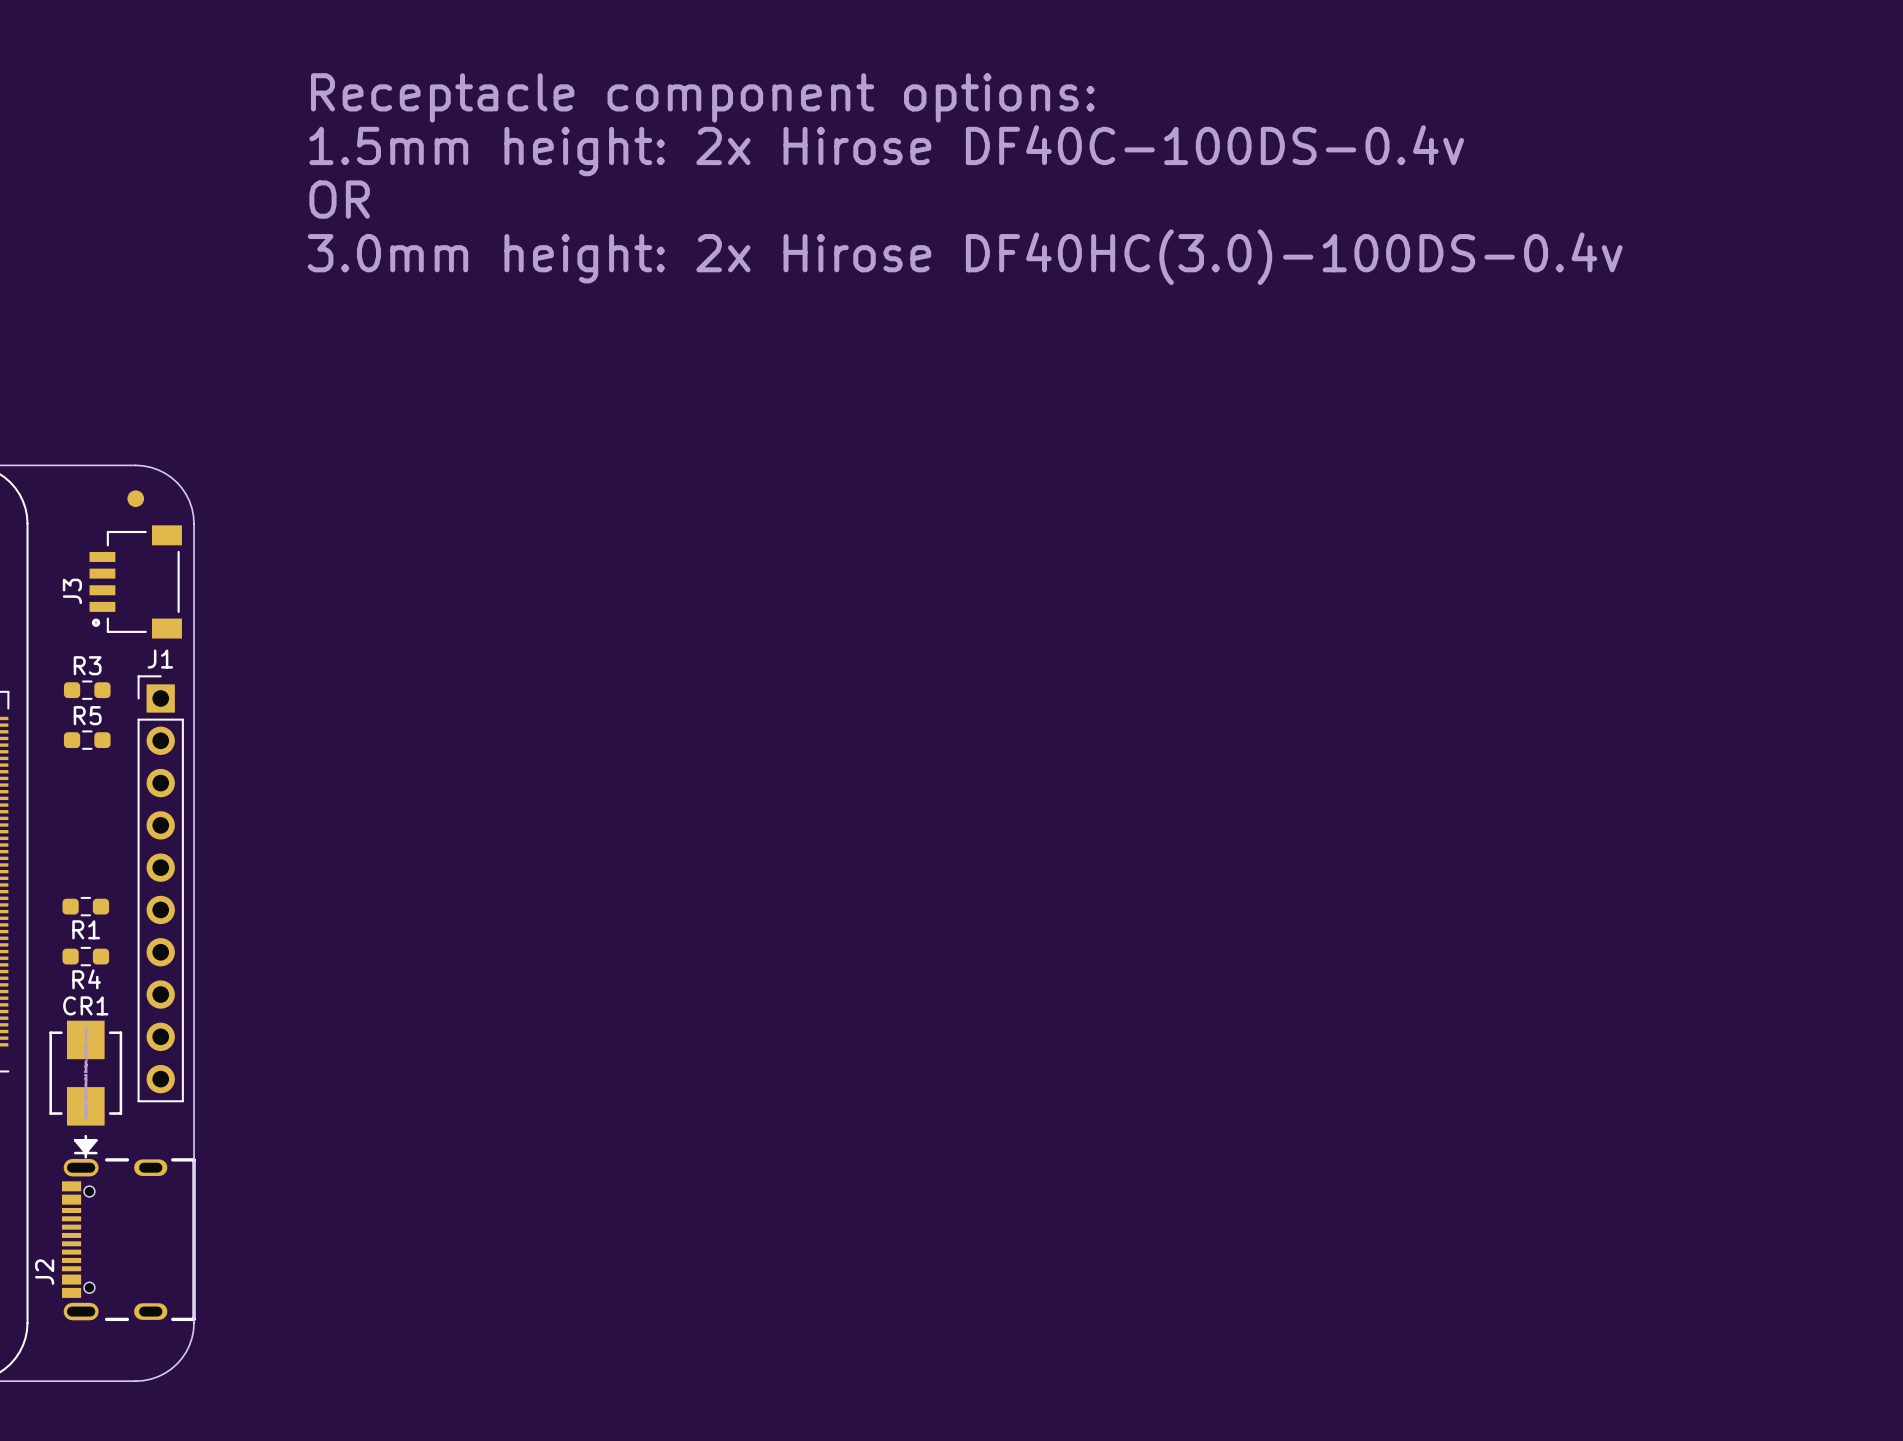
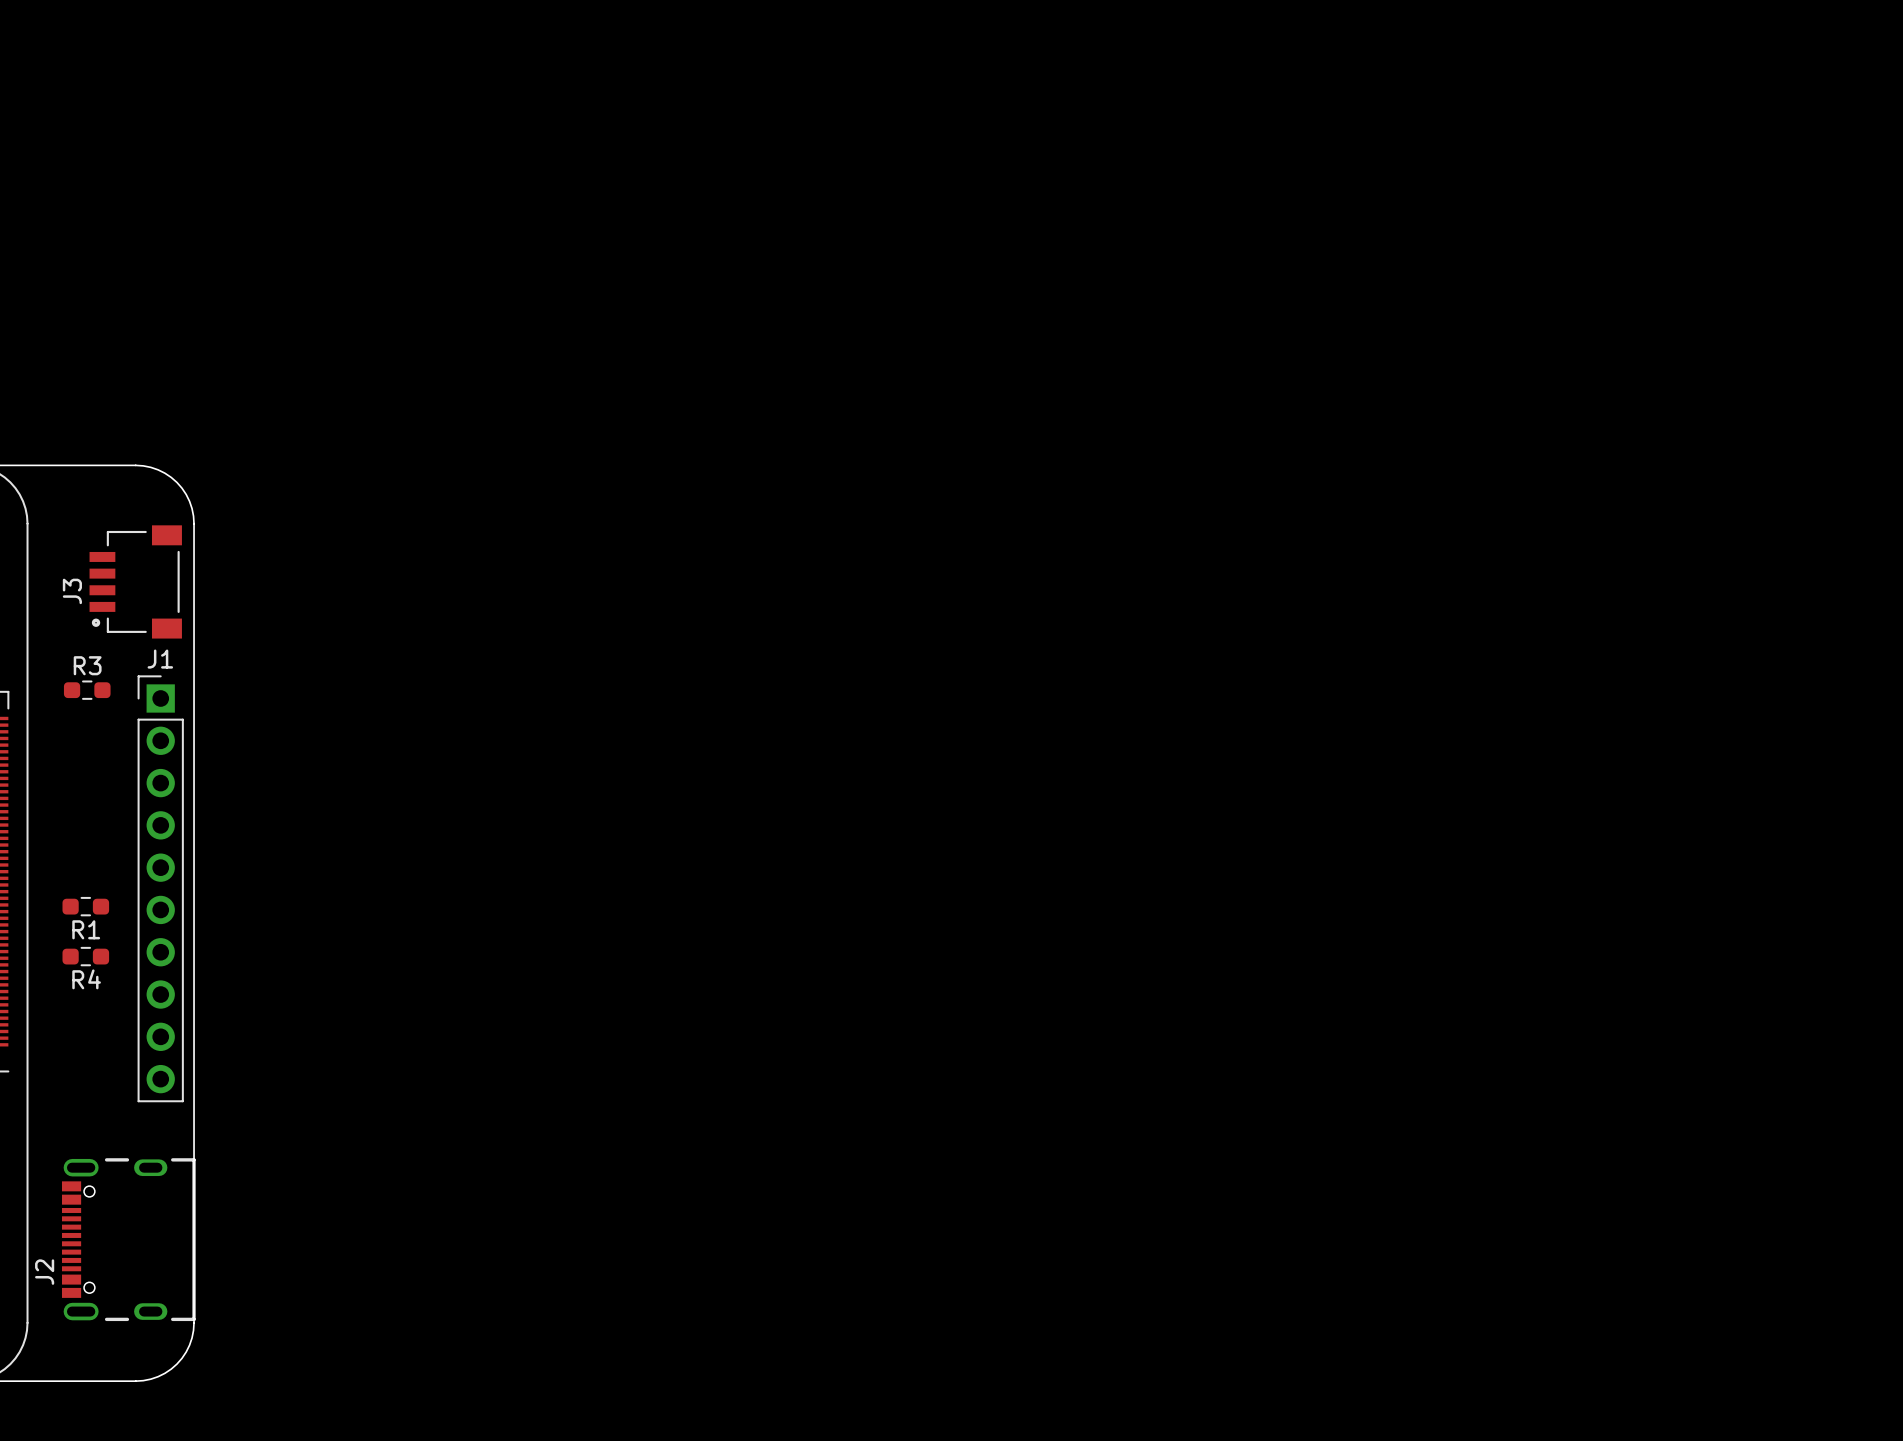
text: Receptacle component options: (702, 97) -> none
text: 1.5mm height: 2x Hirose DF40C-100DS-0.4v (886, 150) -> none
text: OR (339, 199) -> none
text: 3.0mm height: 2x Hirose DF40HC(3.0)-100DS-0.4v (965, 257) -> none
part: (135, 498) -> none
R5: (87, 740) -> none
CR1: (85, 1089) -> none

